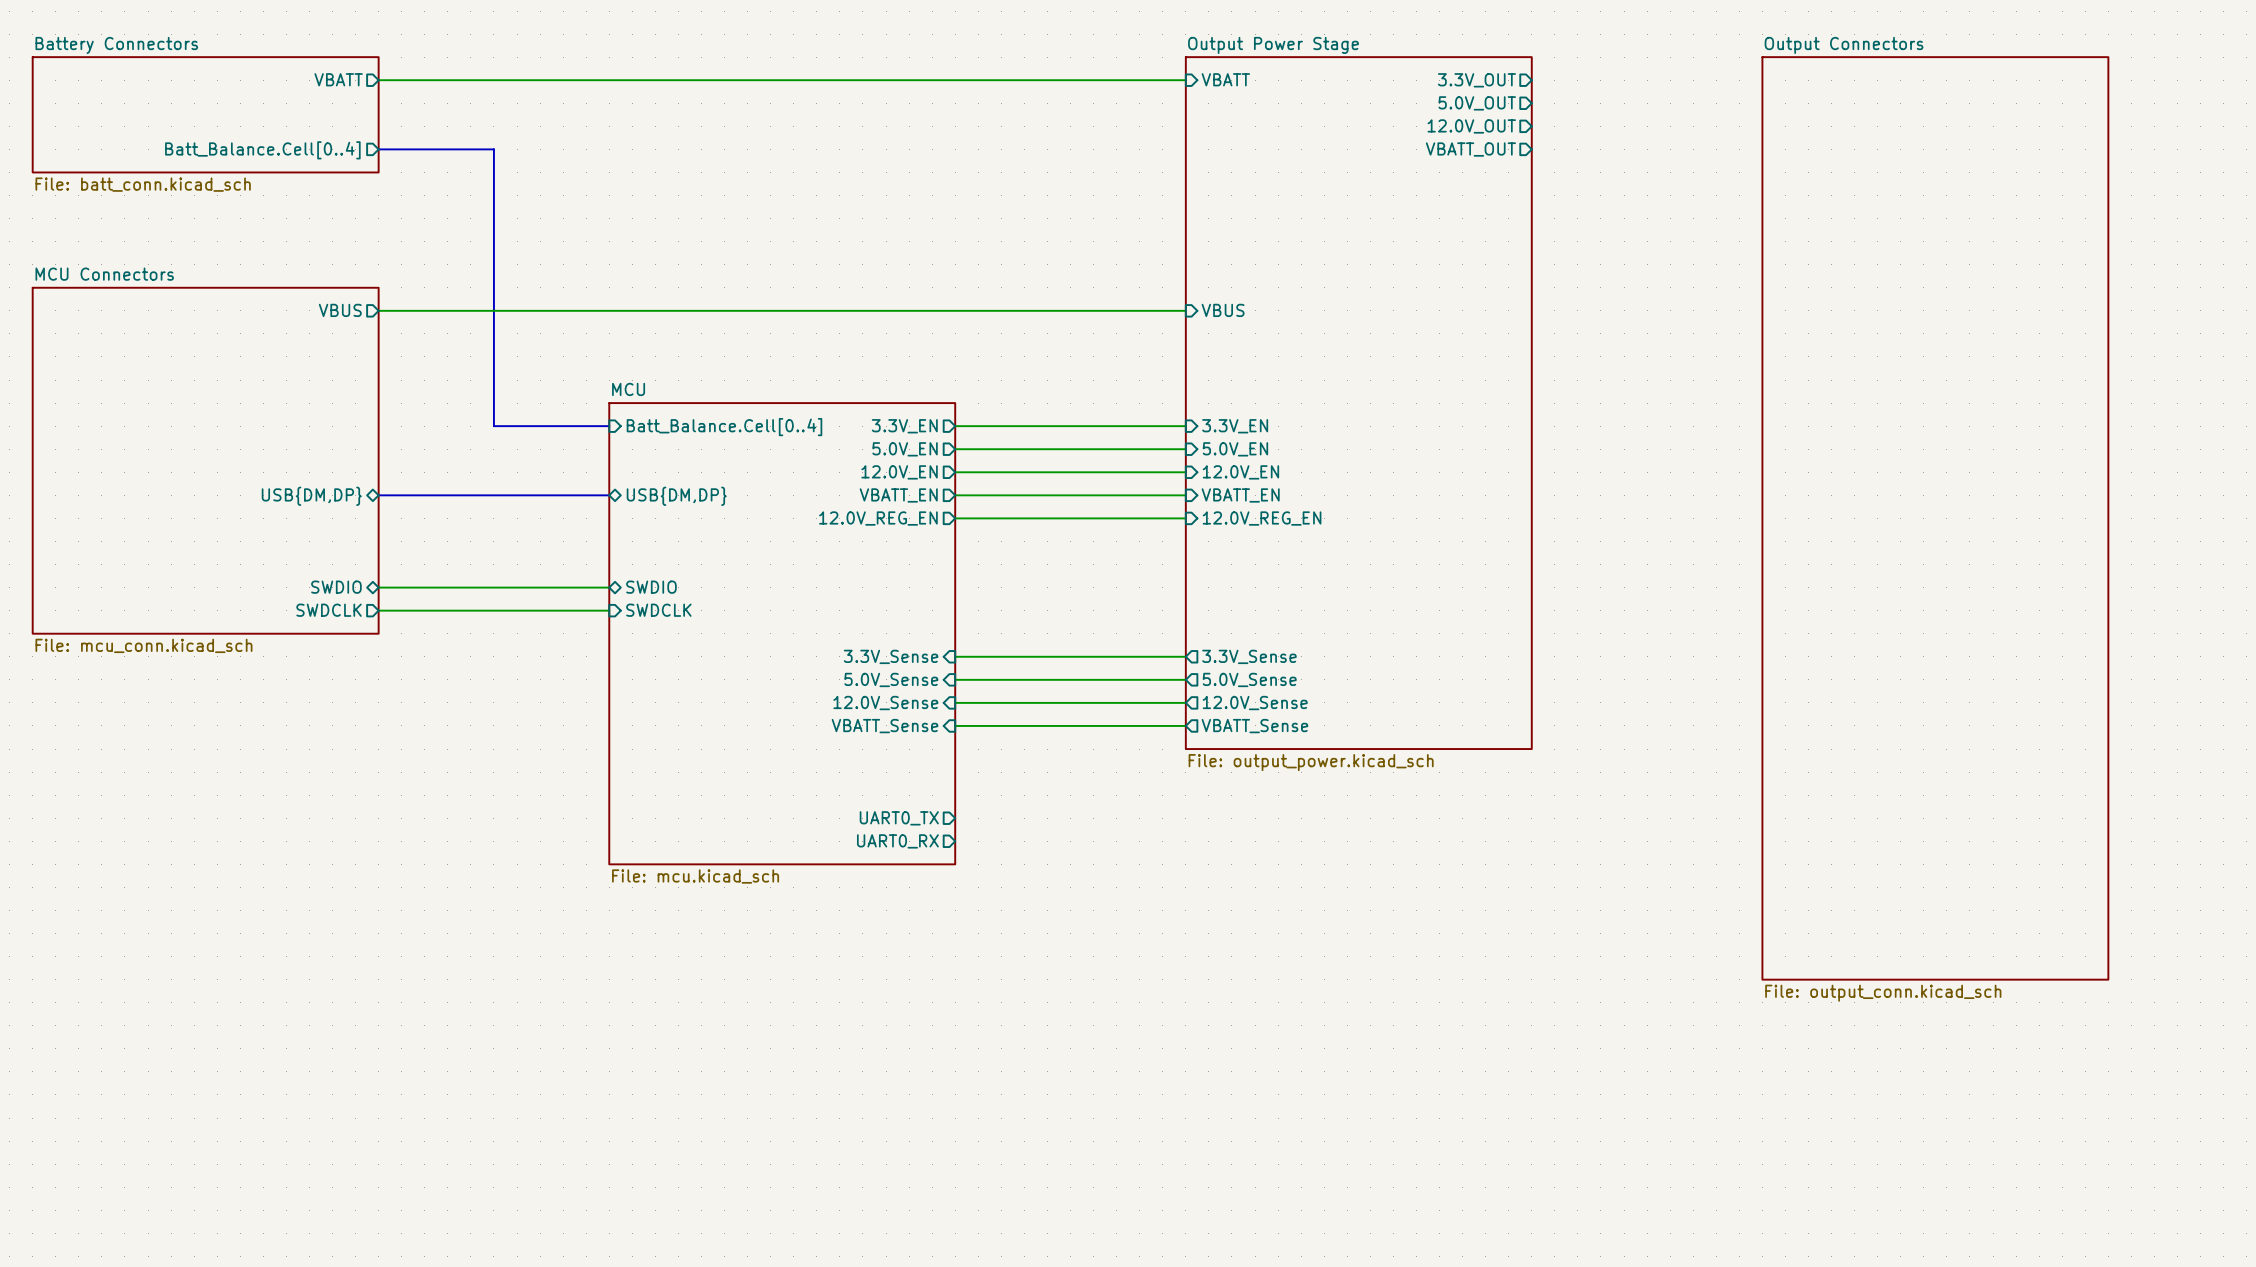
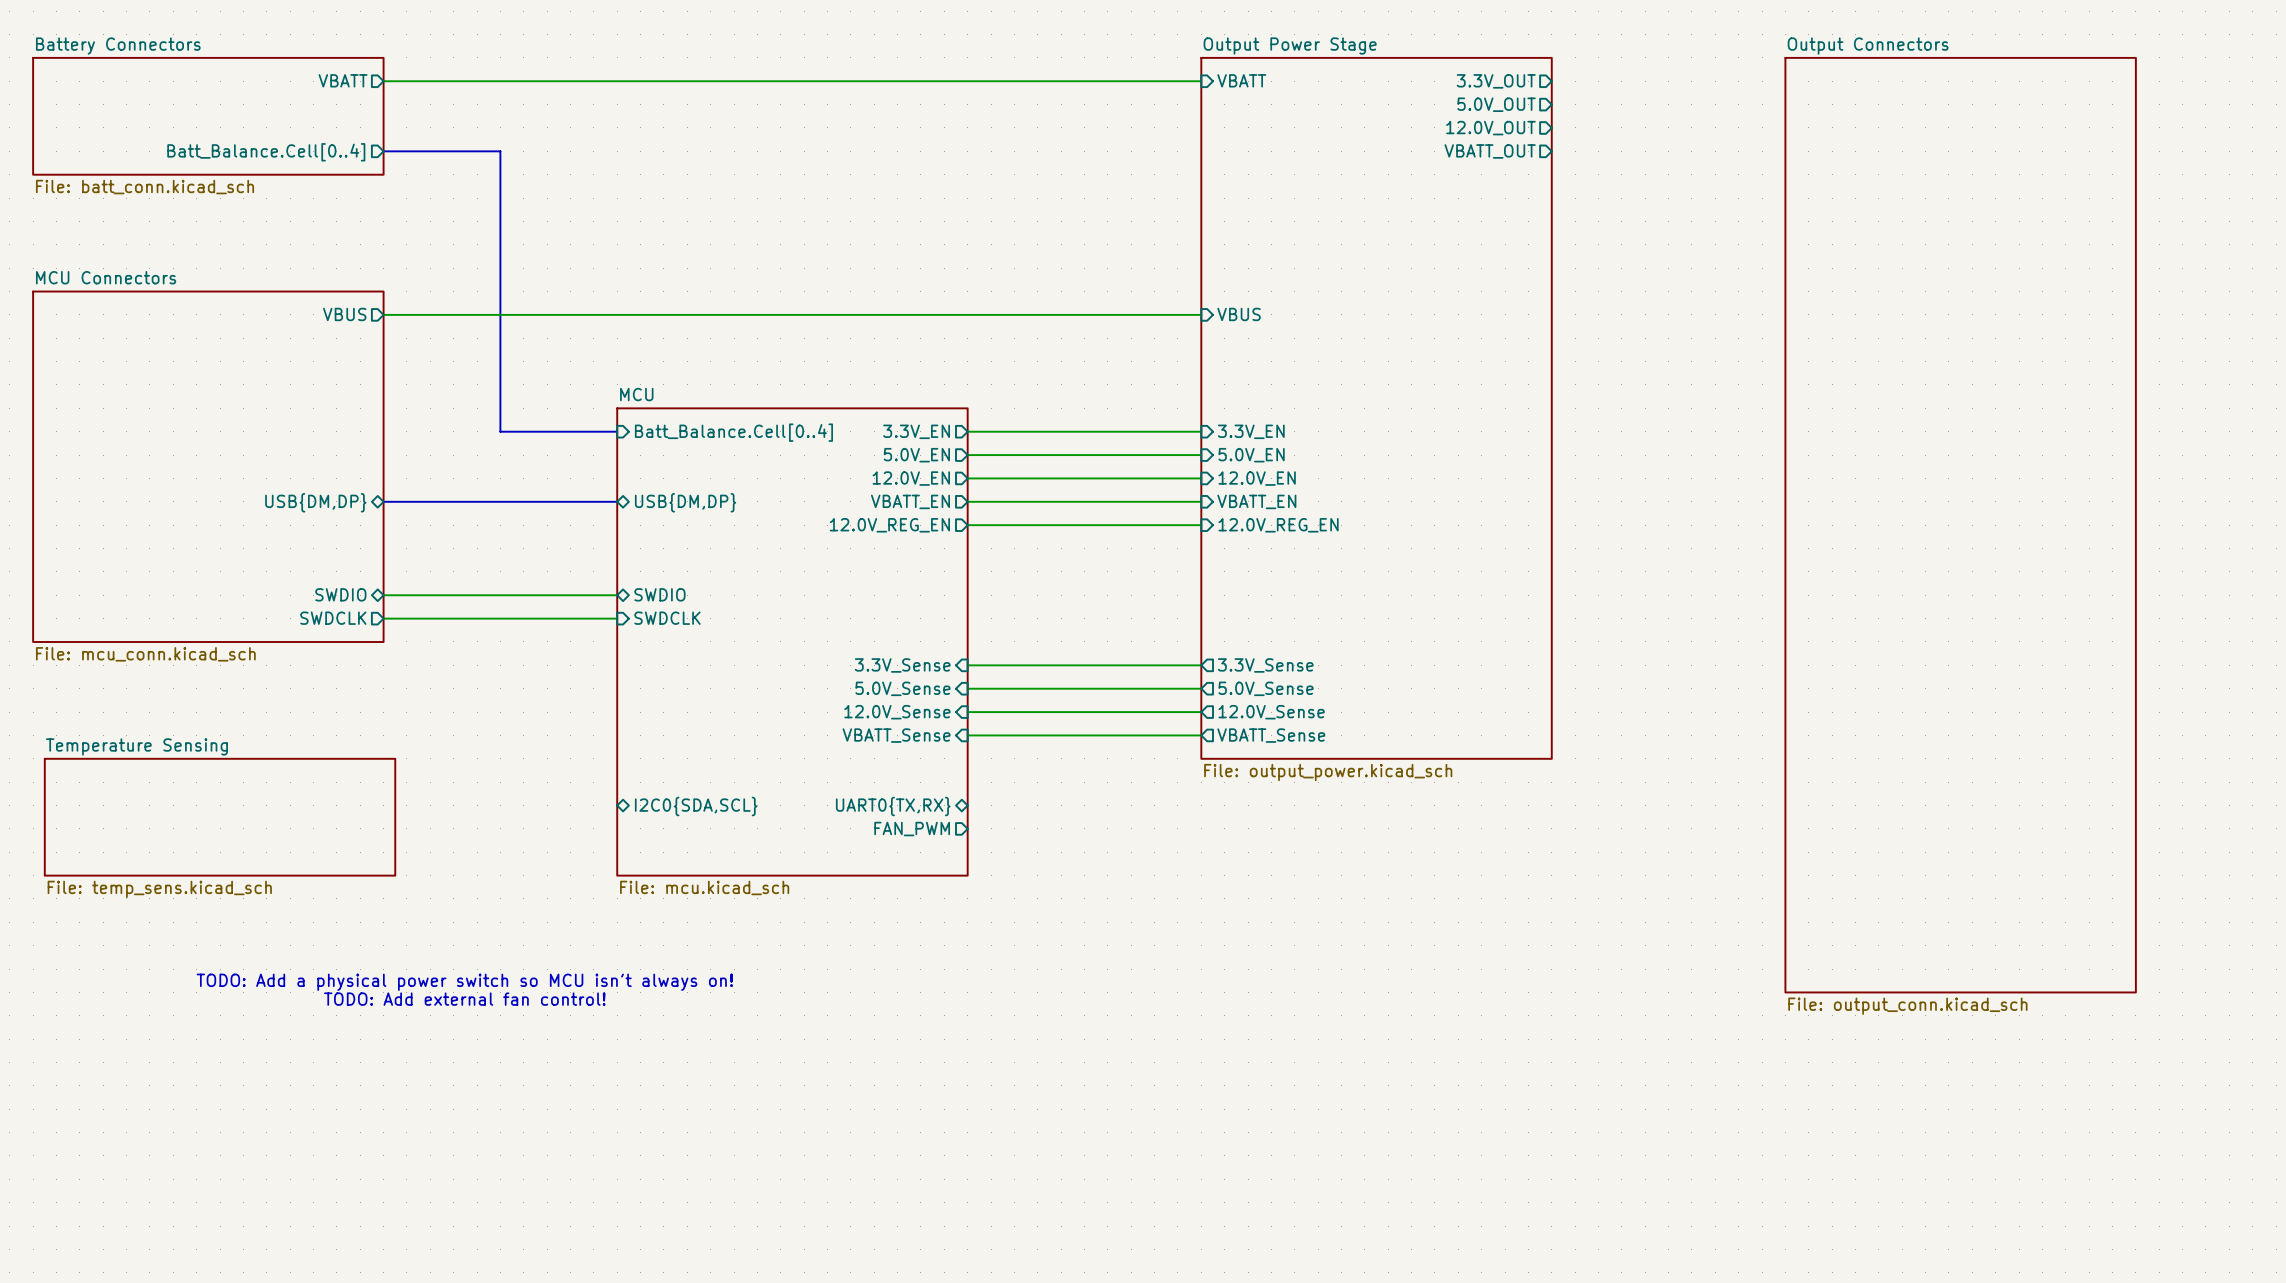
sheet pin: none -> I2C0{SDA,SCL} (696, 806)
sheet pin: none -> UART0{TX,RX} (893, 806)
sheet Temperature Sensing: none -> File: temp_sens.kicad_sch (220, 817)
sheet pin: UART0_TX (899, 818) -> FAN_PWM (912, 829)
sheet pin: UART0_RX (897, 841) -> none
text: none -> TODO: Add a physical power switch so MCU isn't always on! (464, 982)
text: none -> TODO: Add external fan control! (464, 999)

